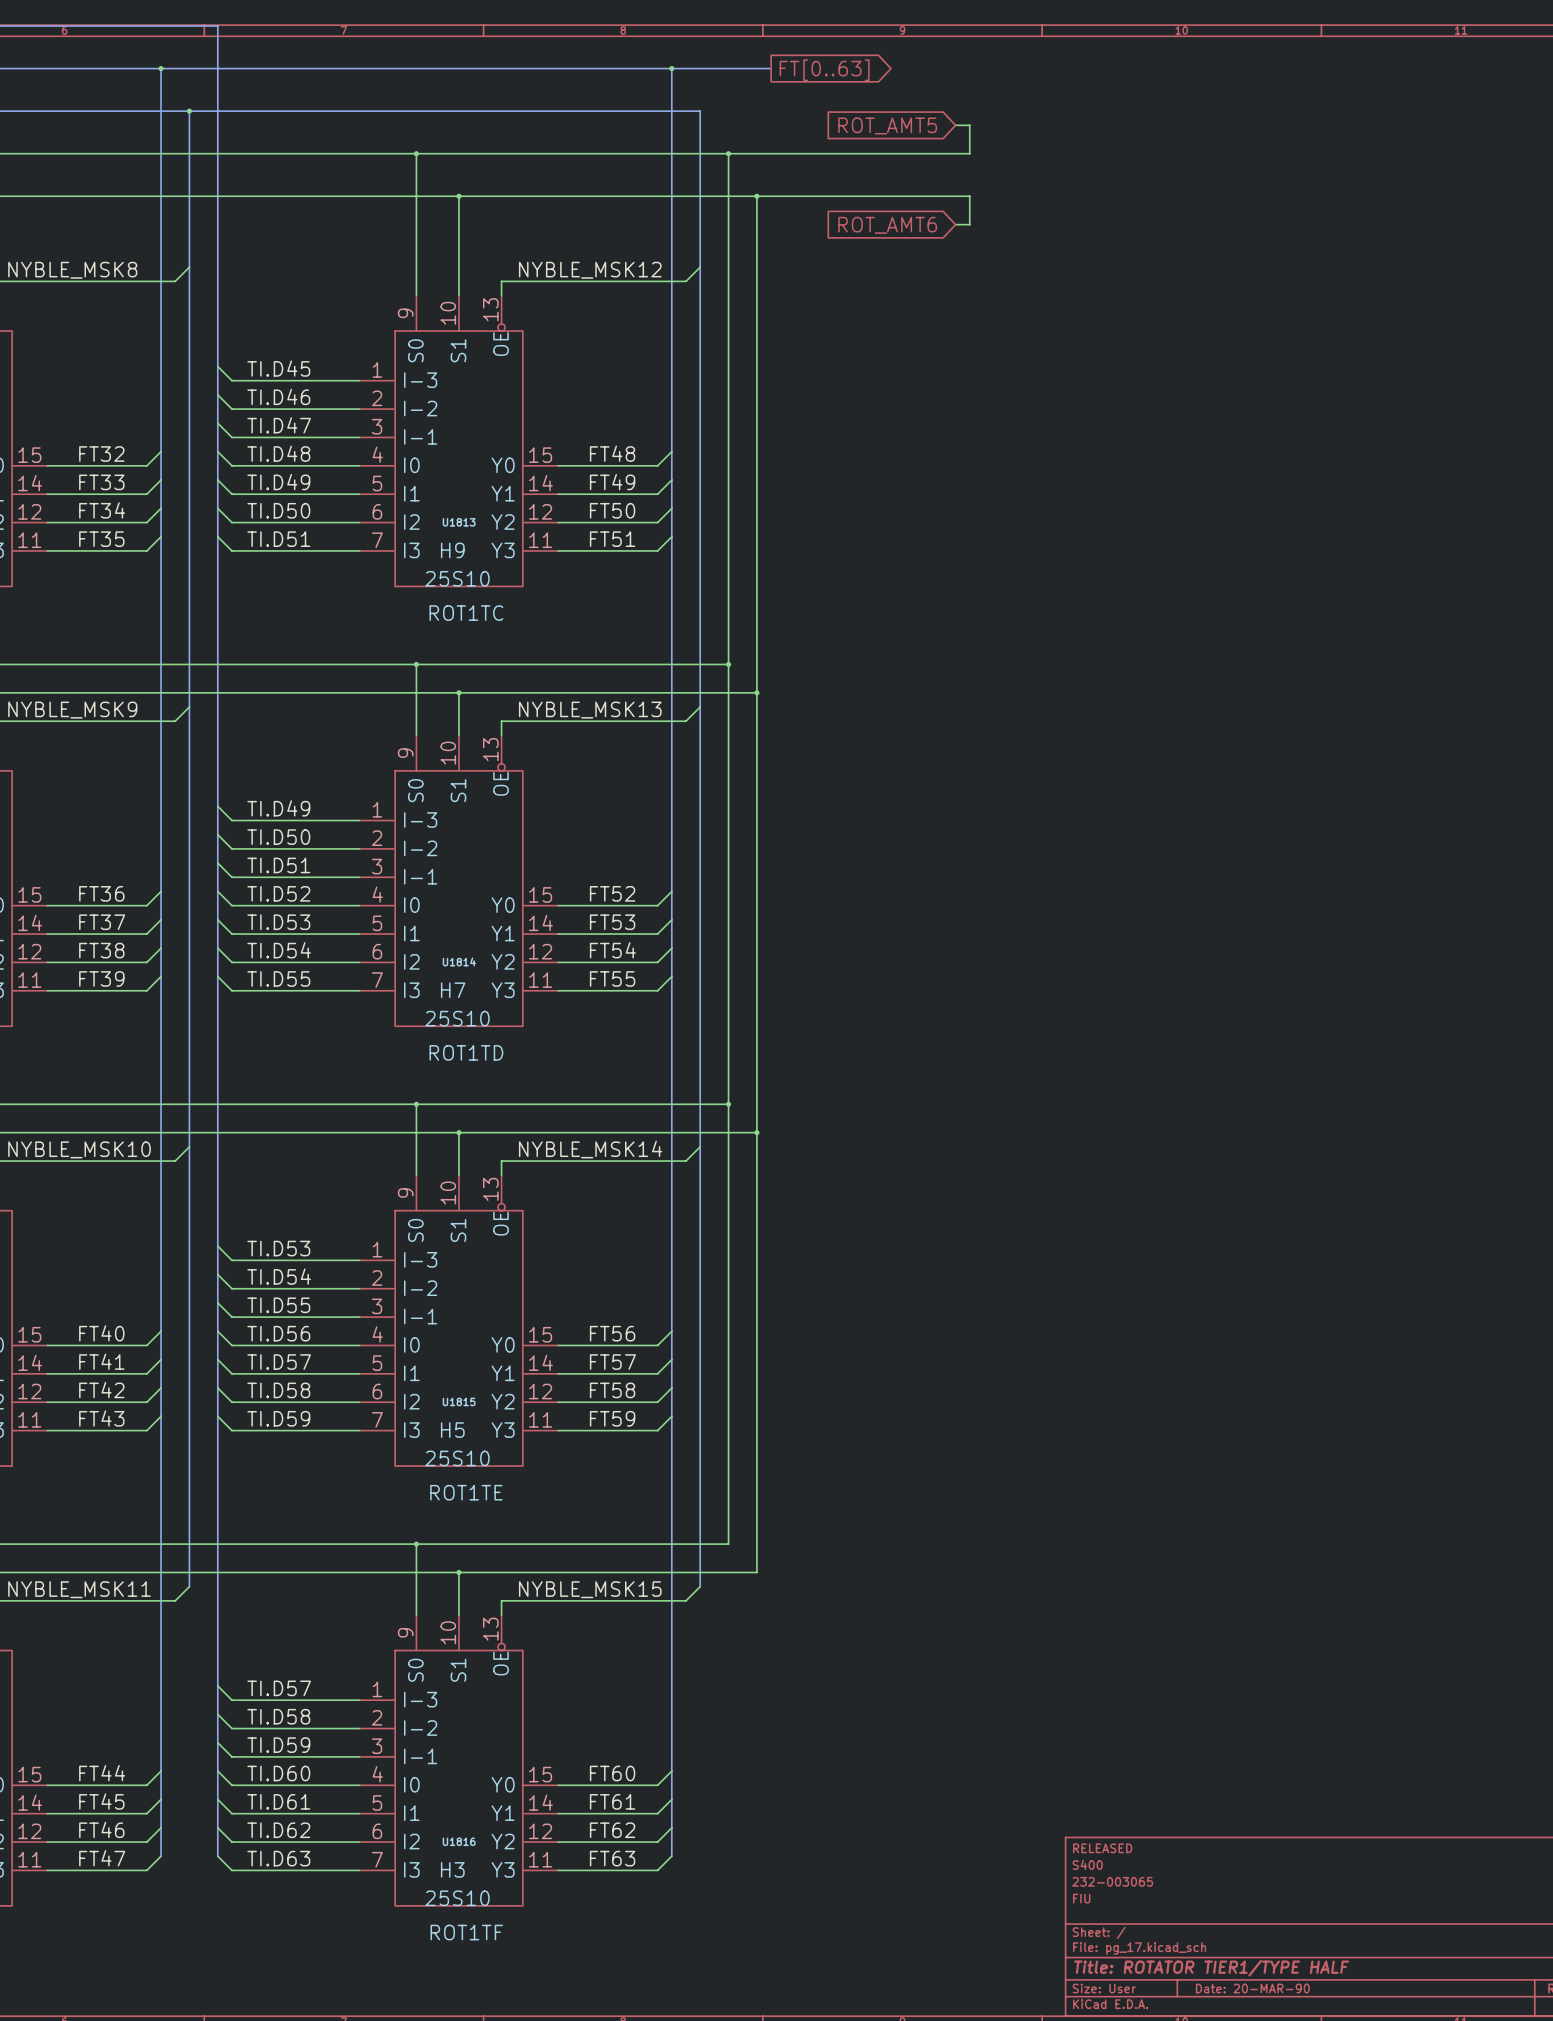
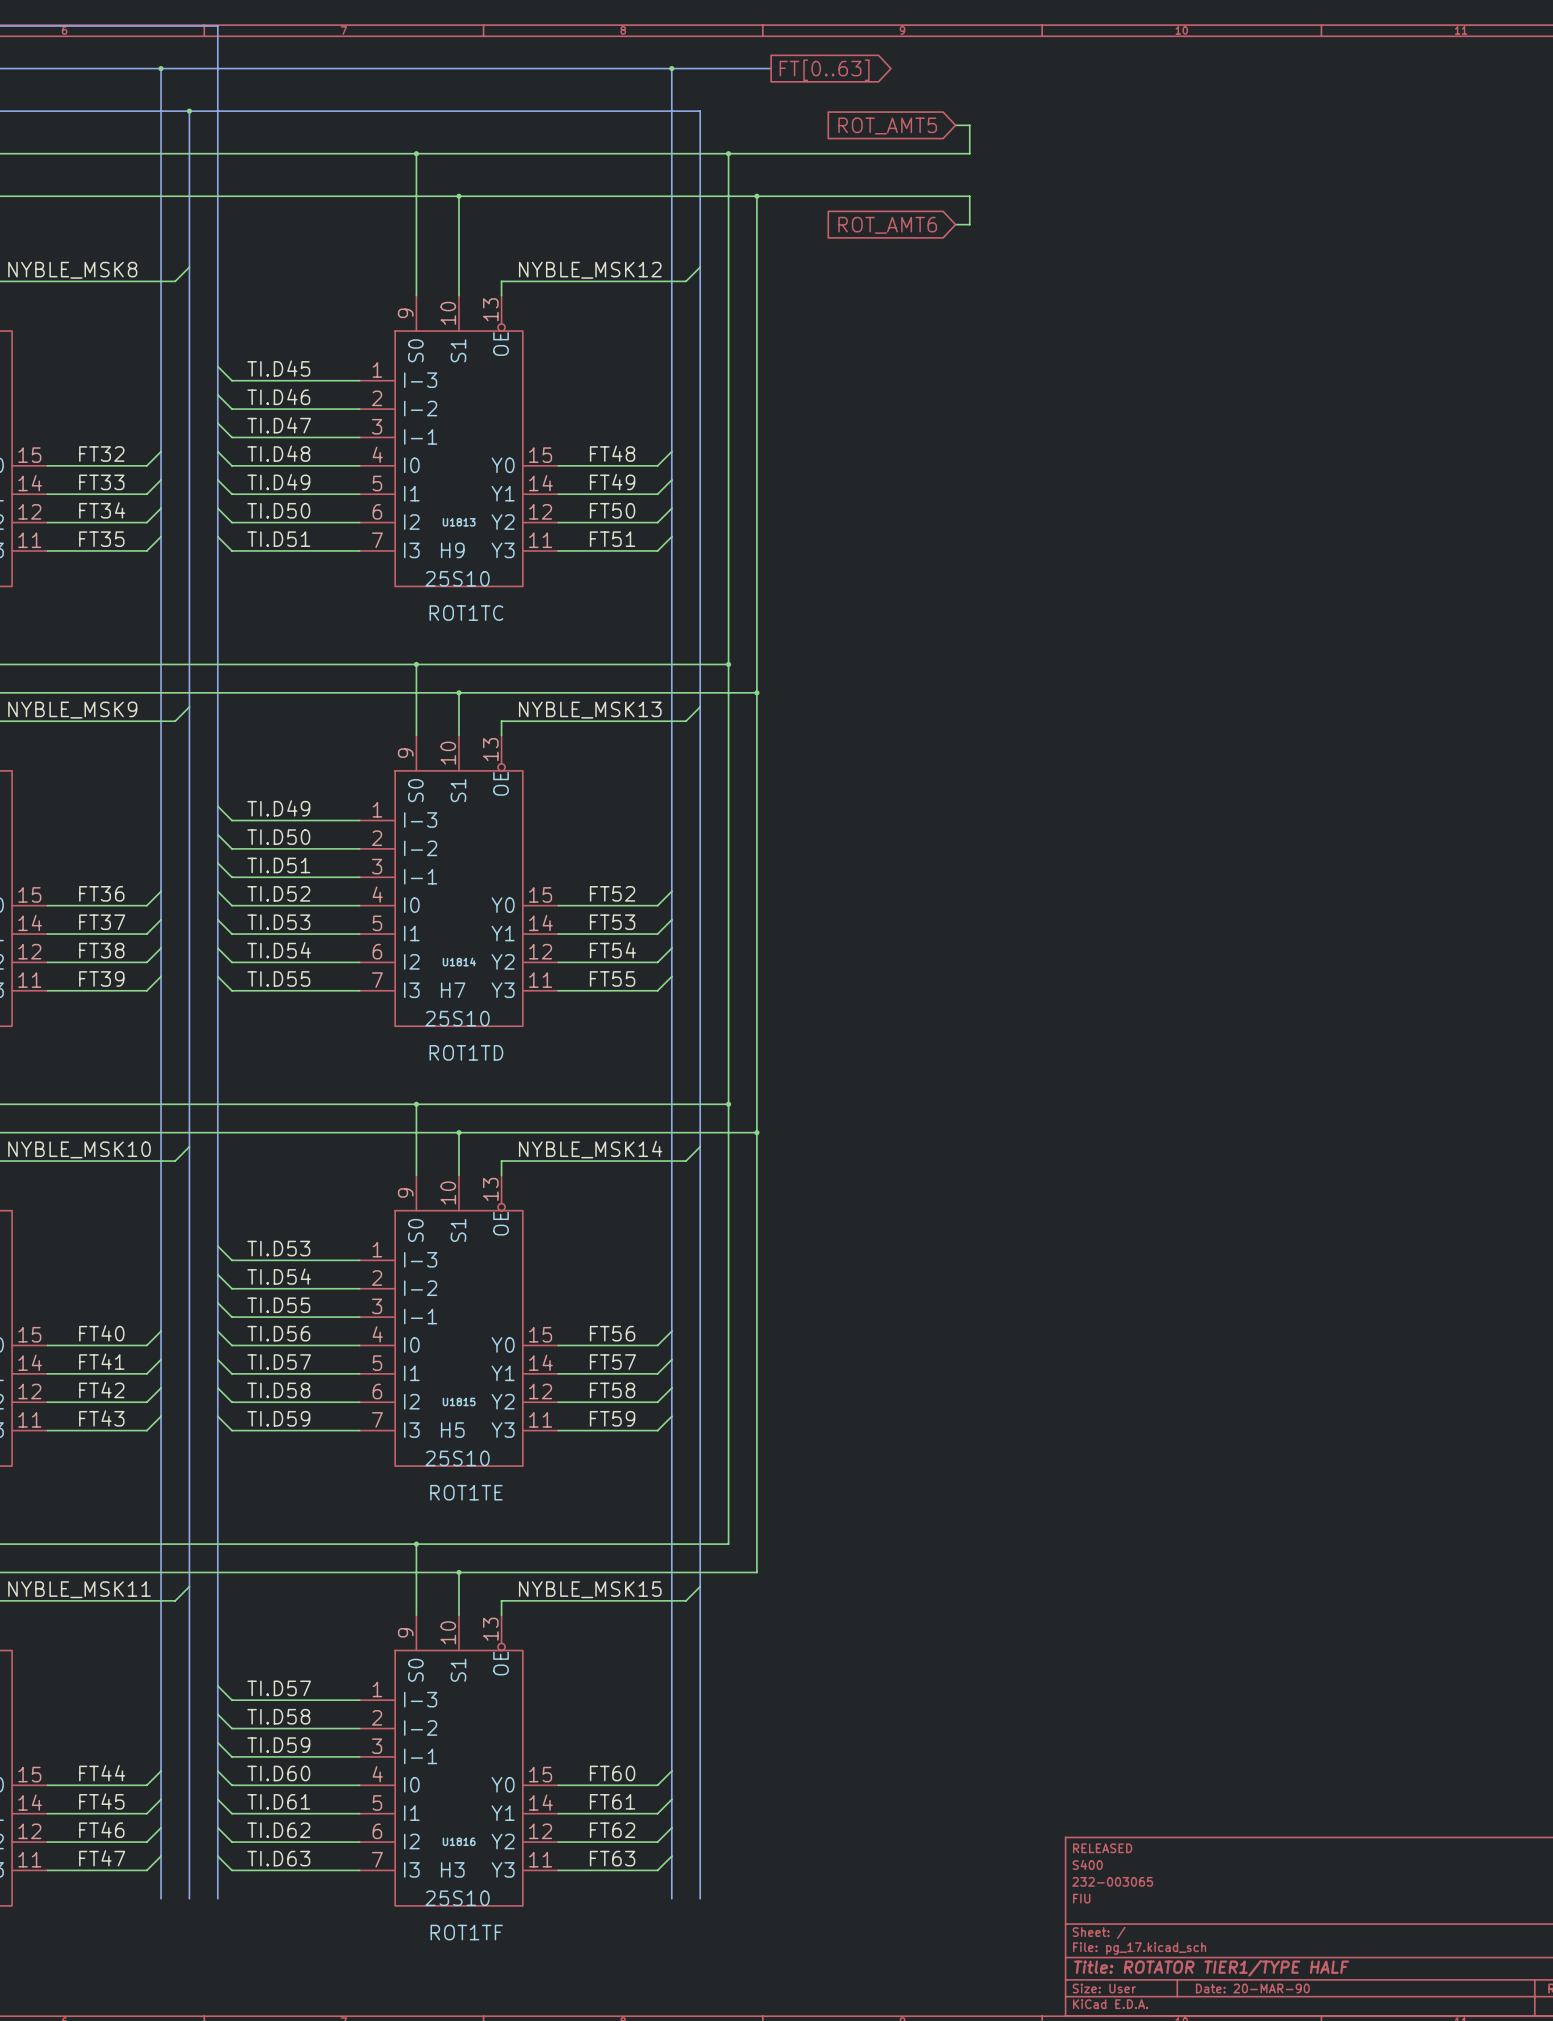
bus: none -> (189, 1586) (189, 1898)
bus: none -> (700, 1586) (700, 1898)
bus: none -> (161, 1856) (161, 1898)
bus: none -> (217, 1856) (217, 1898)
bus: none -> (671, 1856) (671, 1898)

